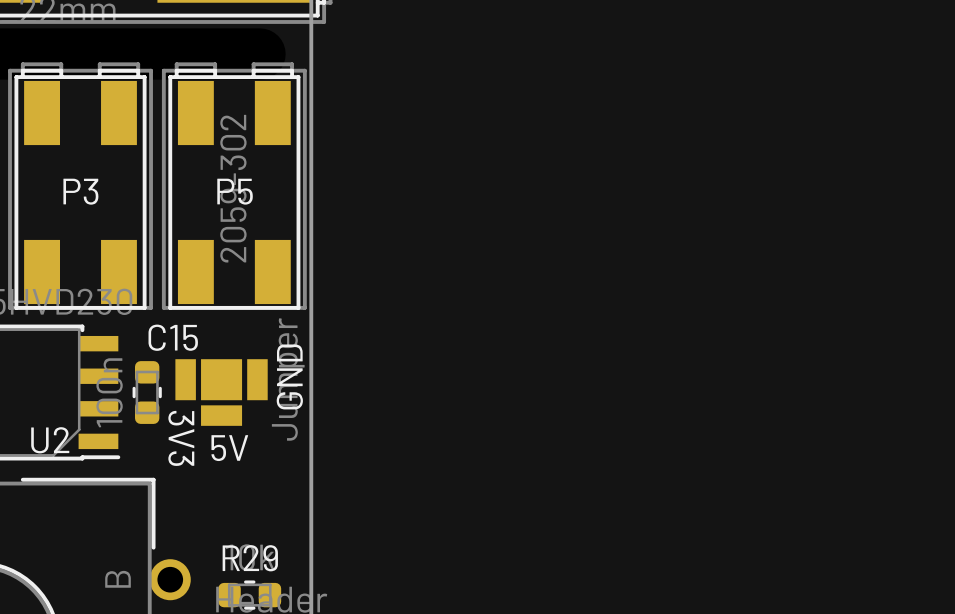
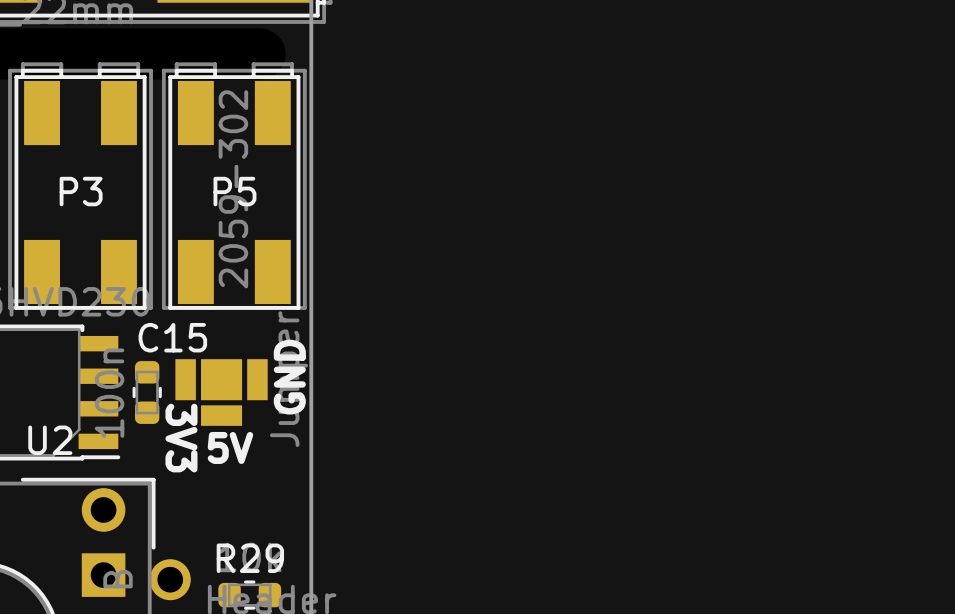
part: none -> (103, 542)

